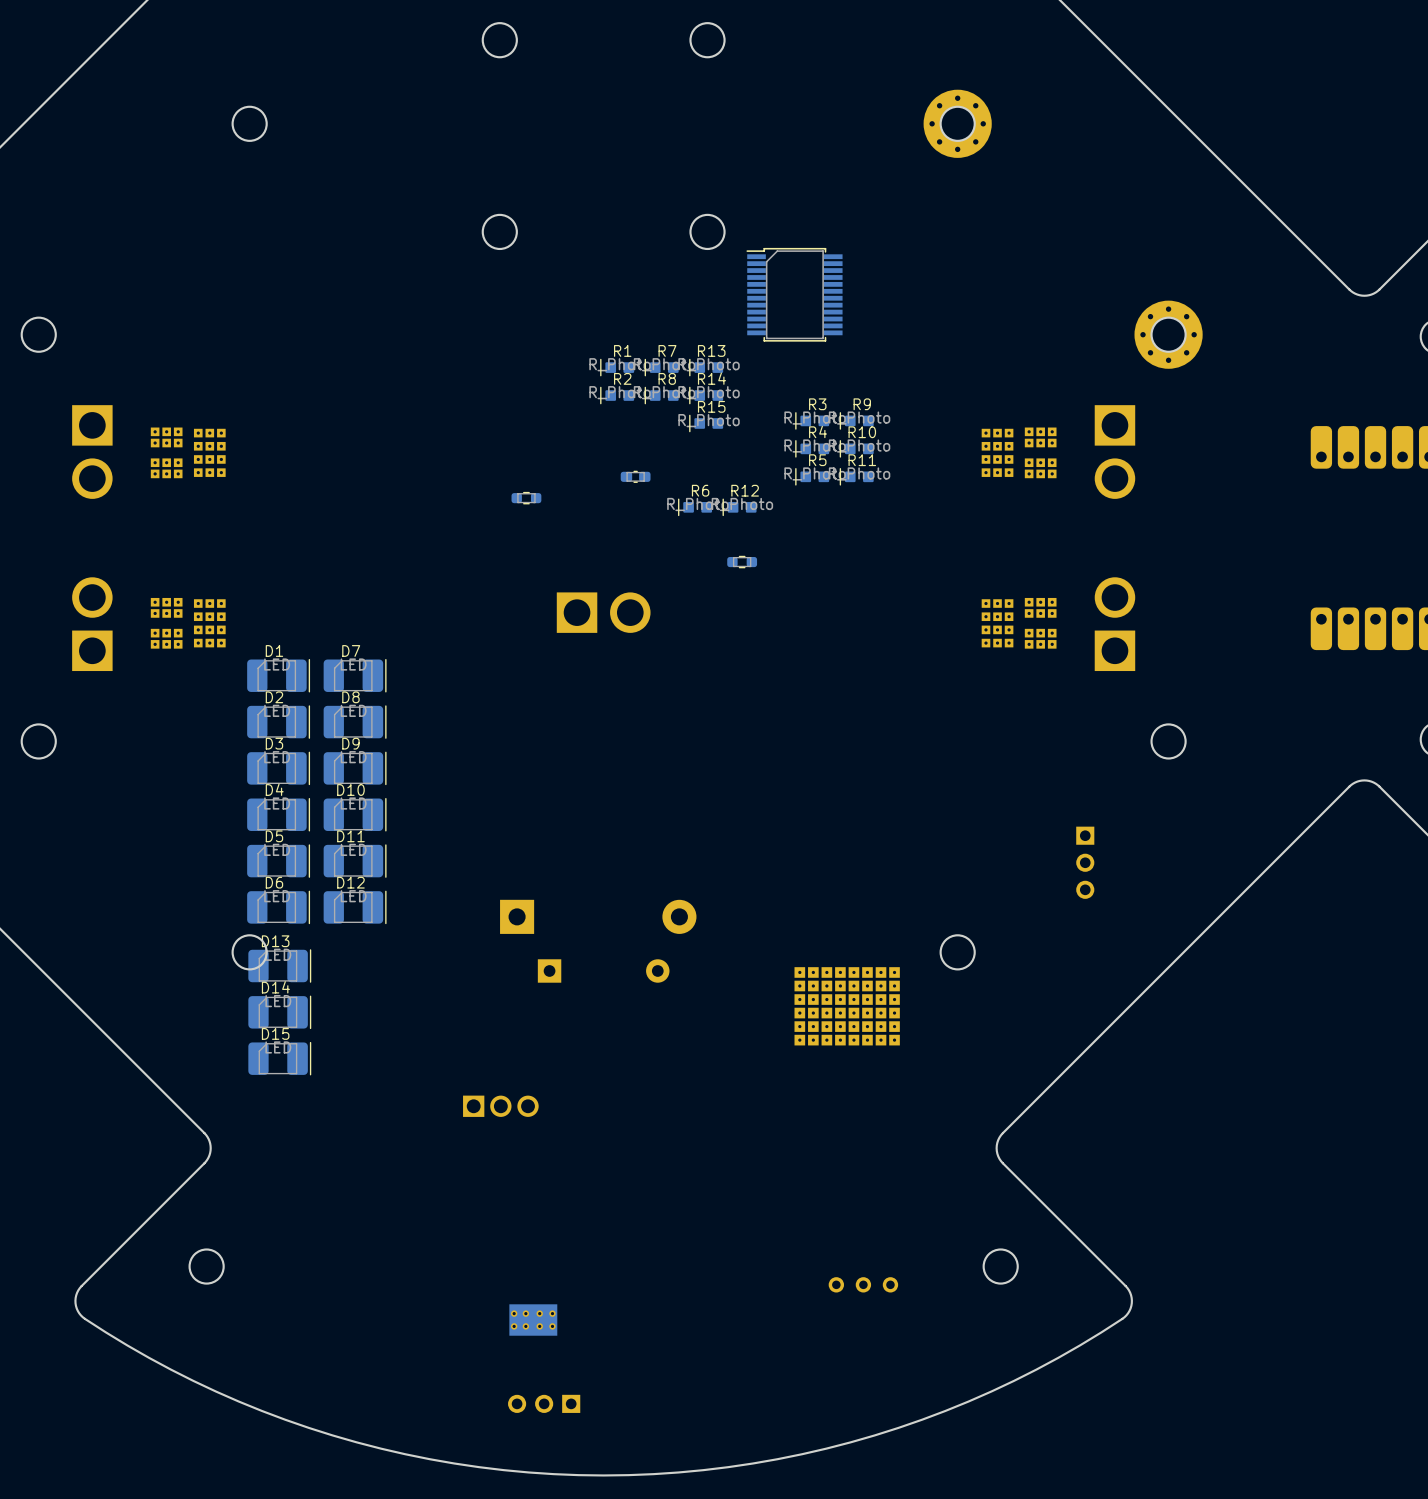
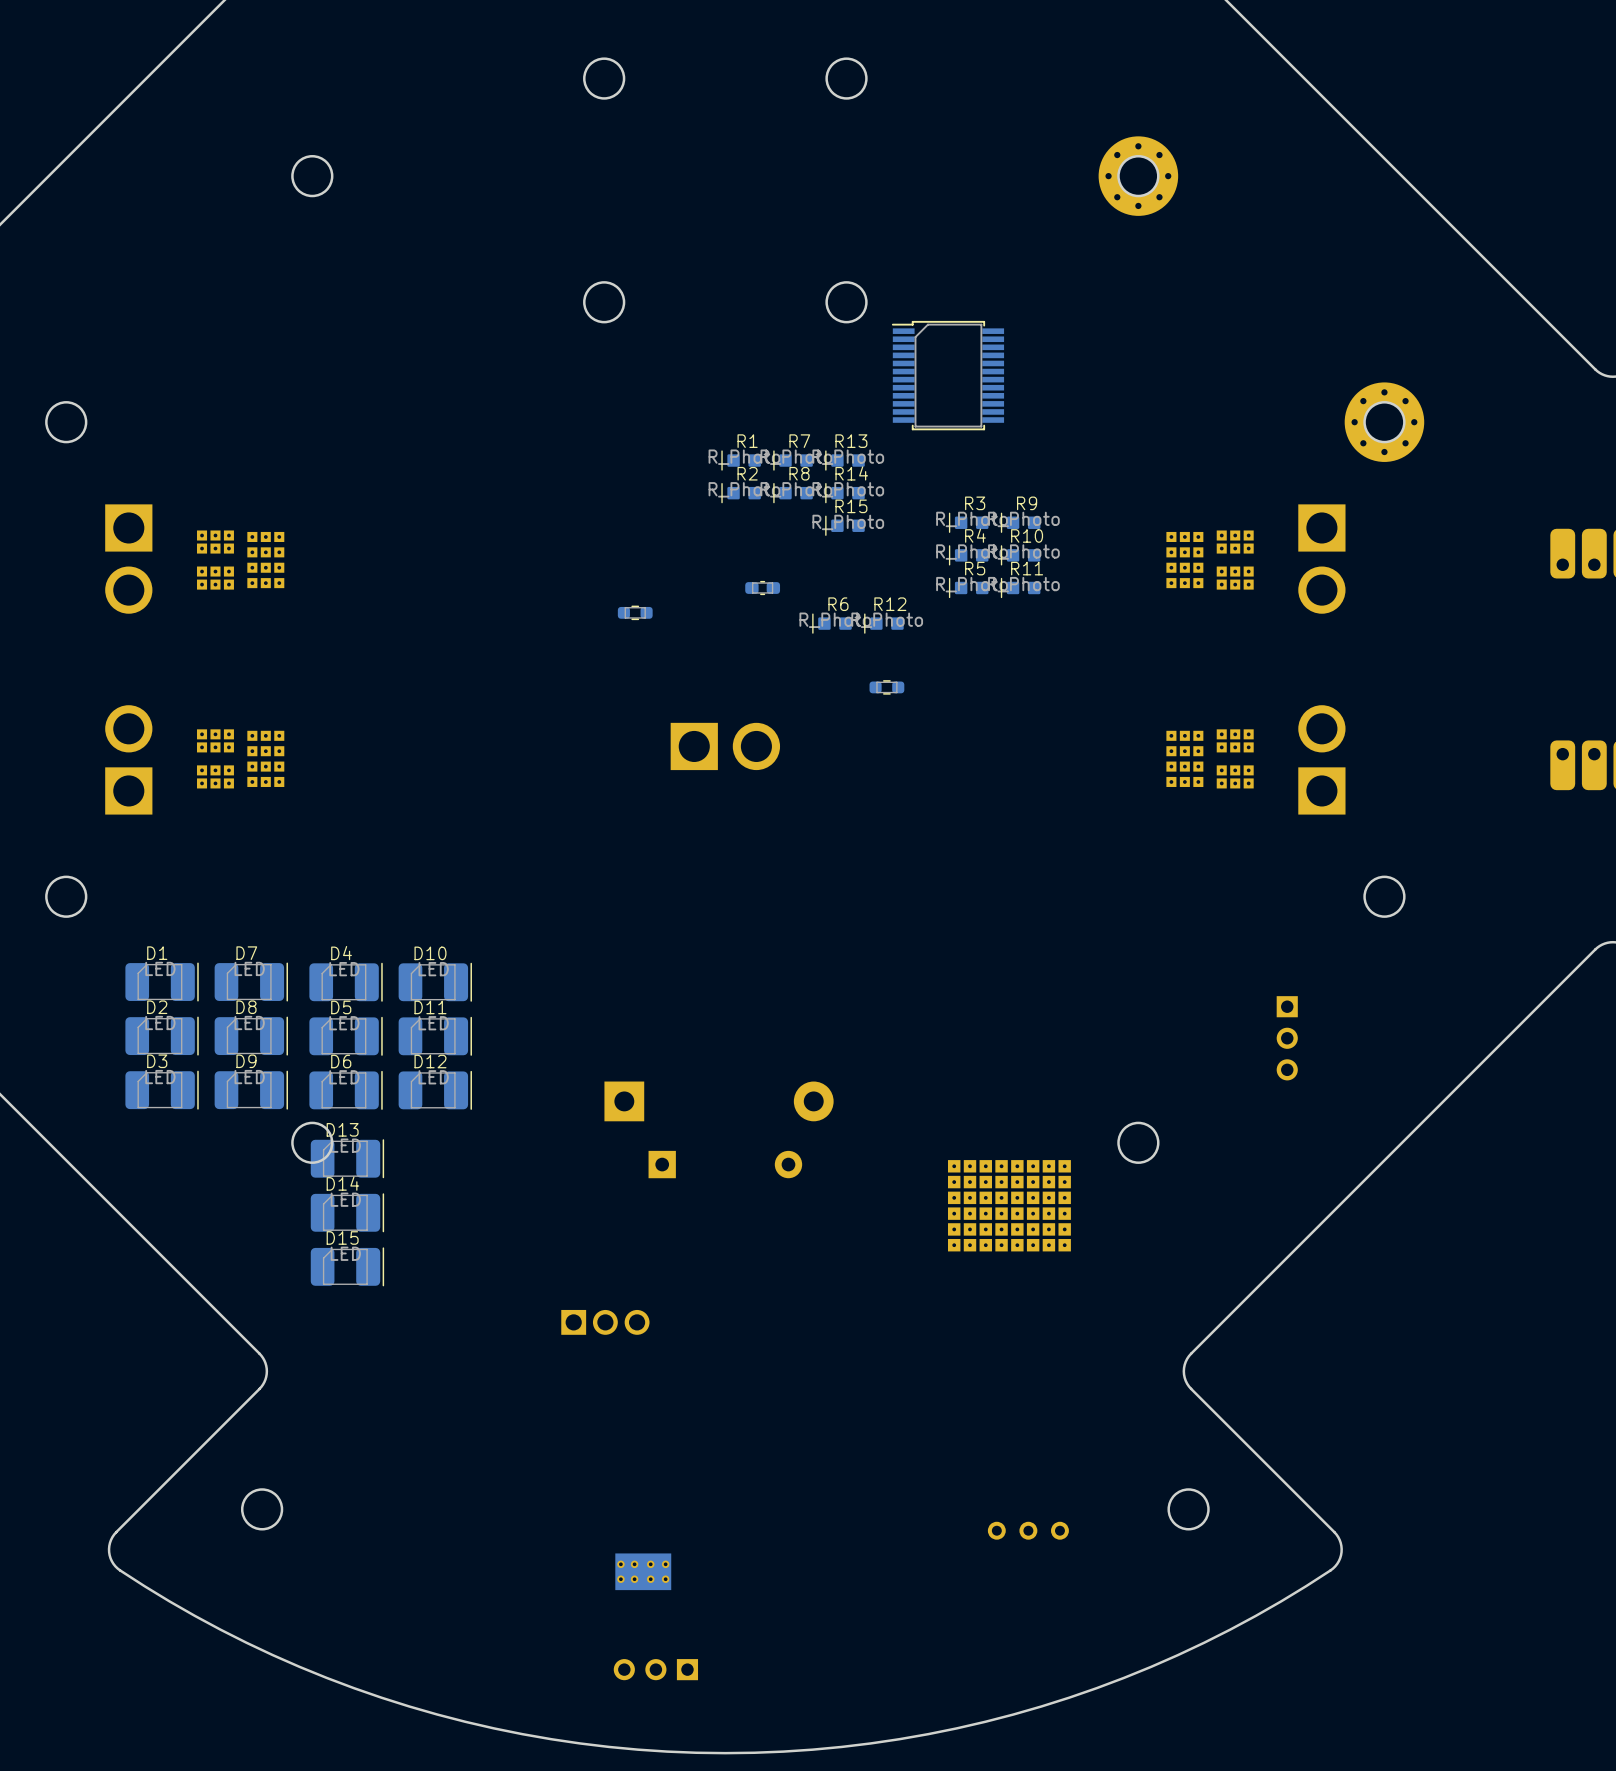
D1 position: (278, 675) -> (162, 982)
D7 position: (355, 675) -> (251, 982)
D2 position: (278, 722) -> (162, 1036)
D8 position: (355, 722) -> (251, 1036)
D3 position: (278, 768) -> (162, 1090)
D9 position: (355, 768) -> (251, 1090)

